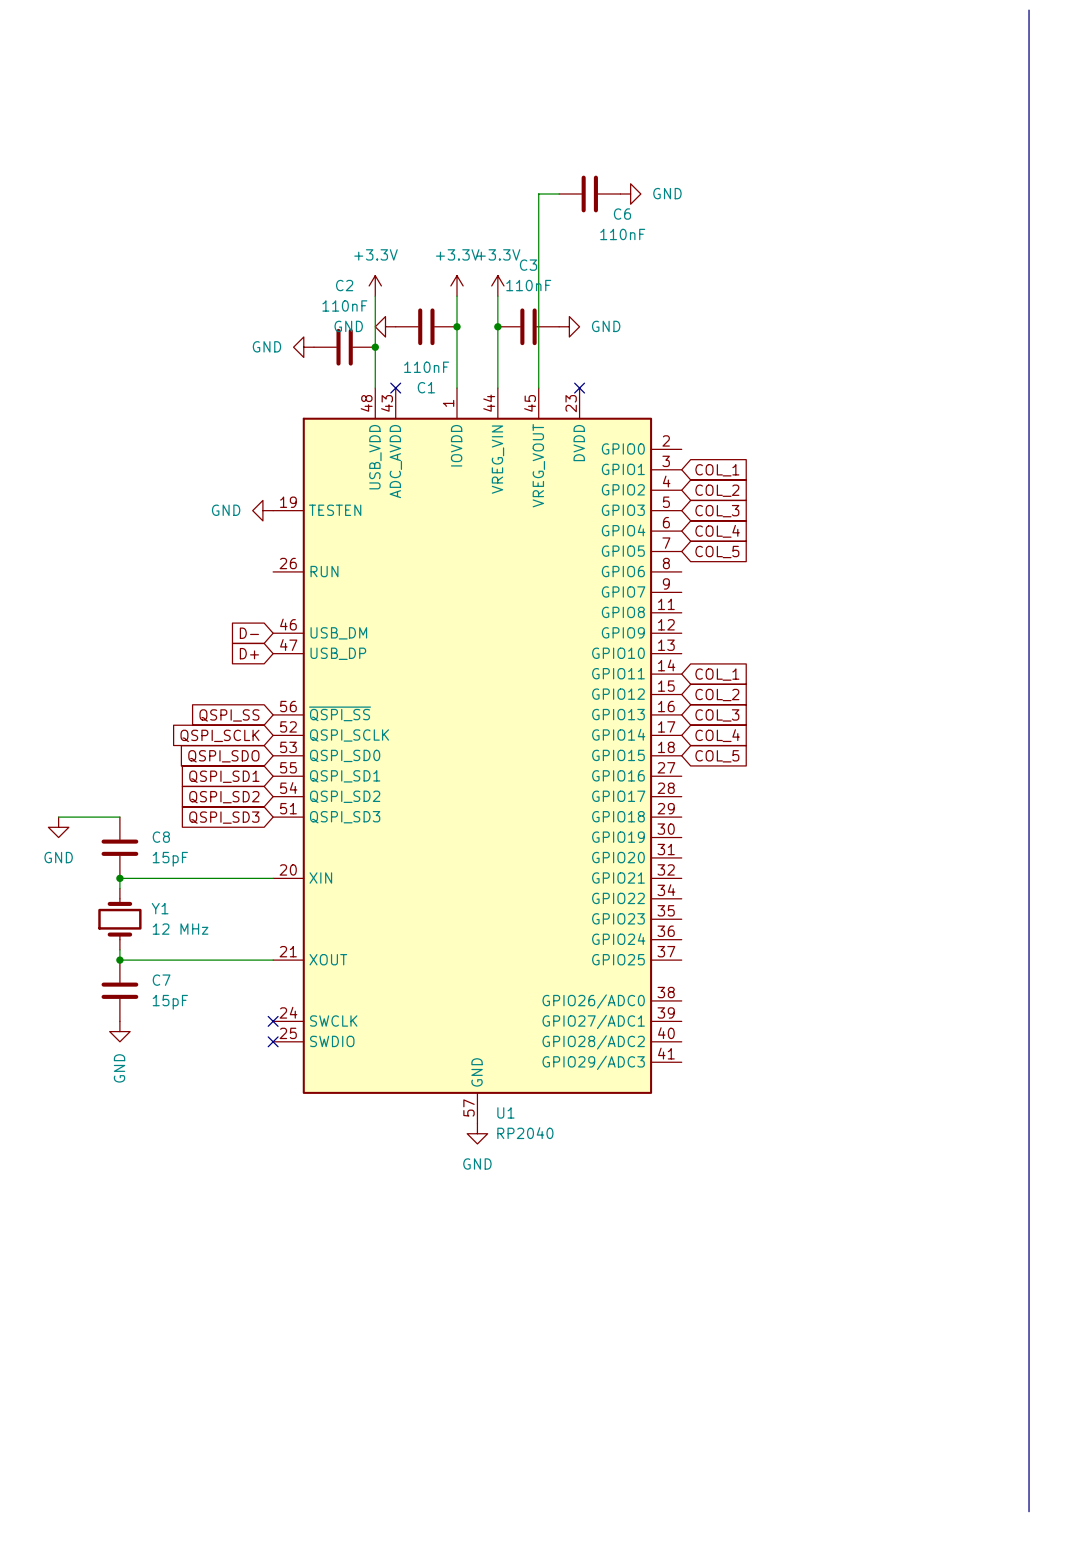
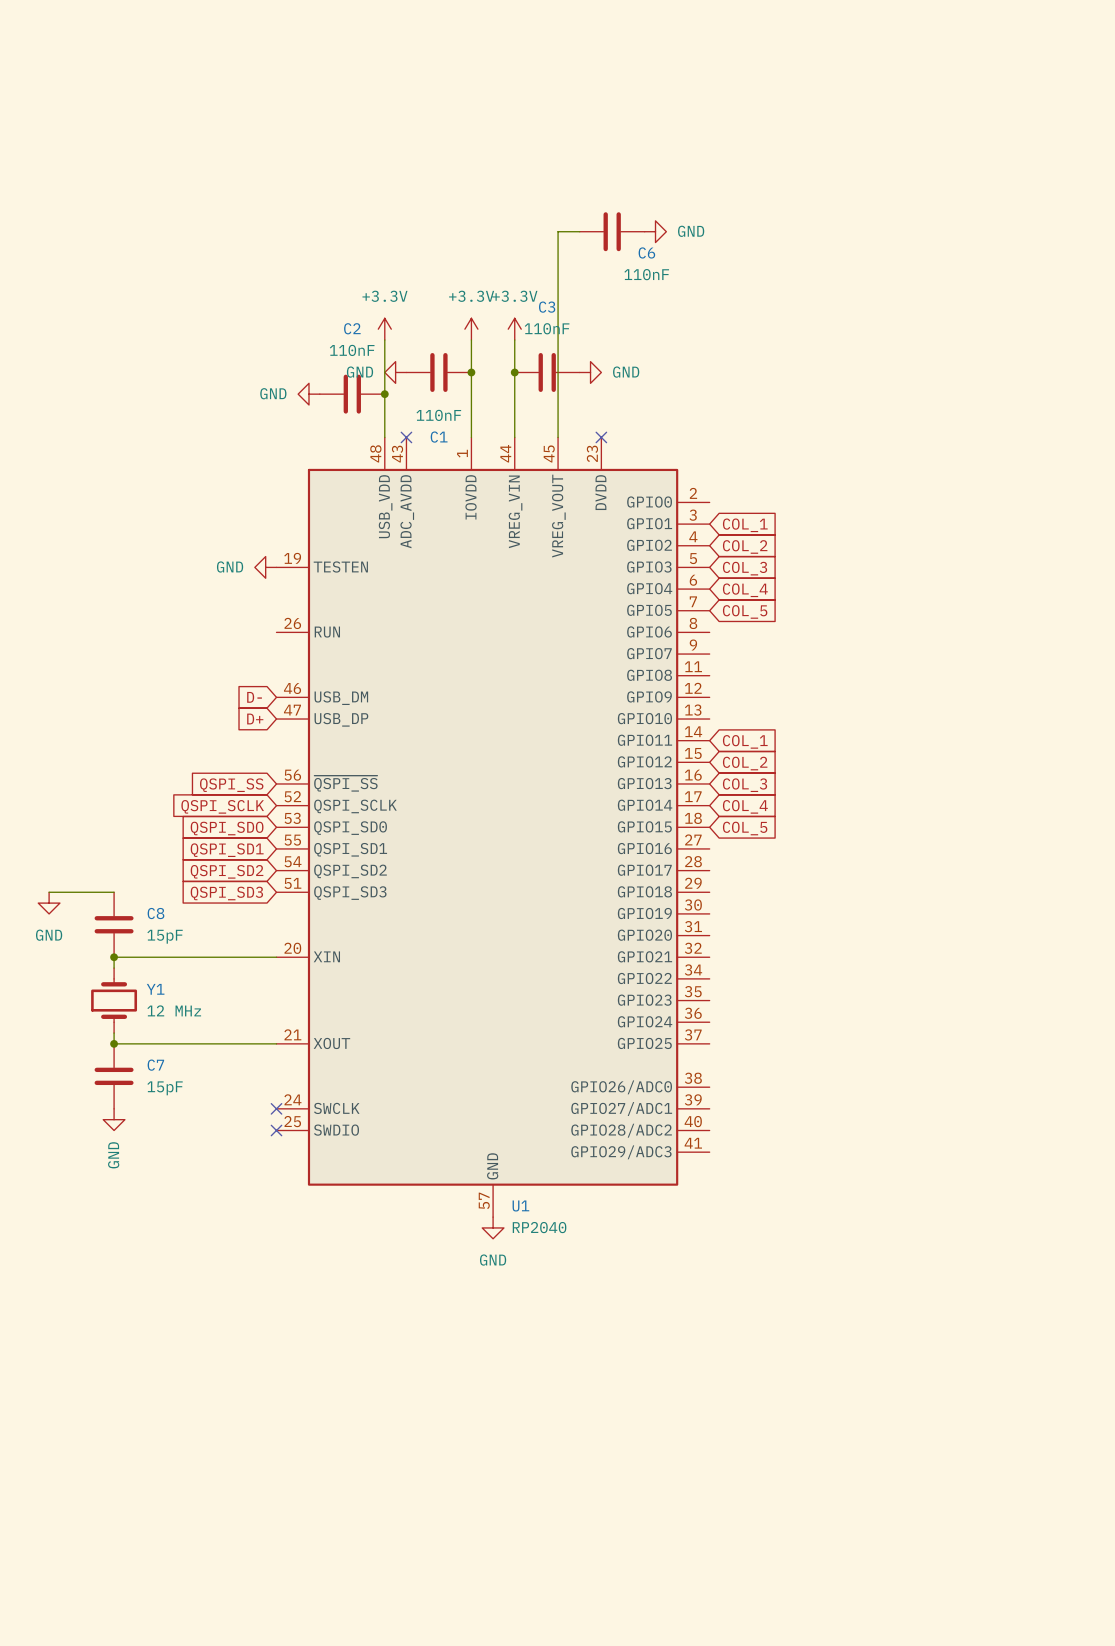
line: (1029, 10) (1029, 1511) -> none

